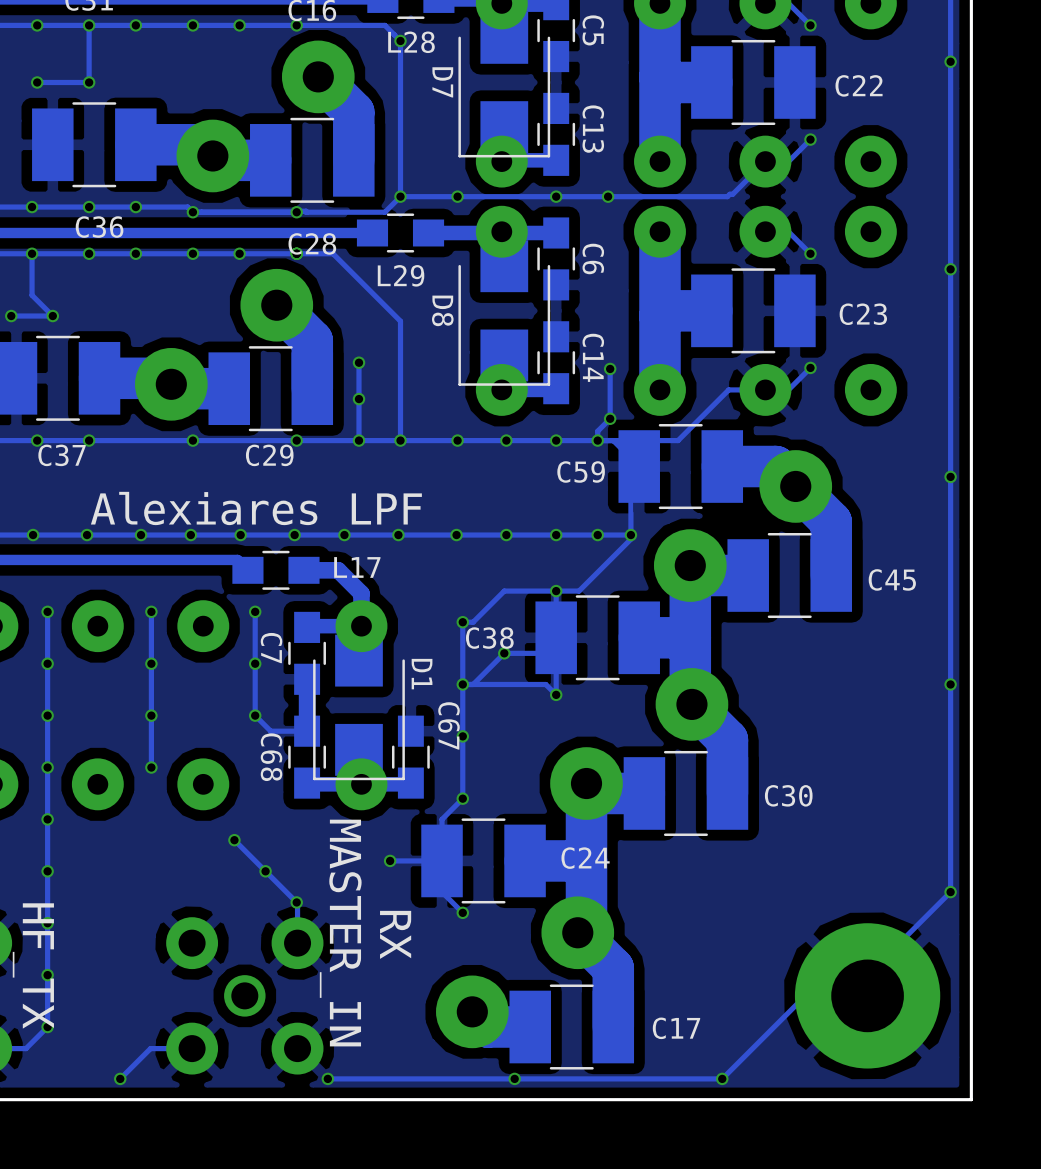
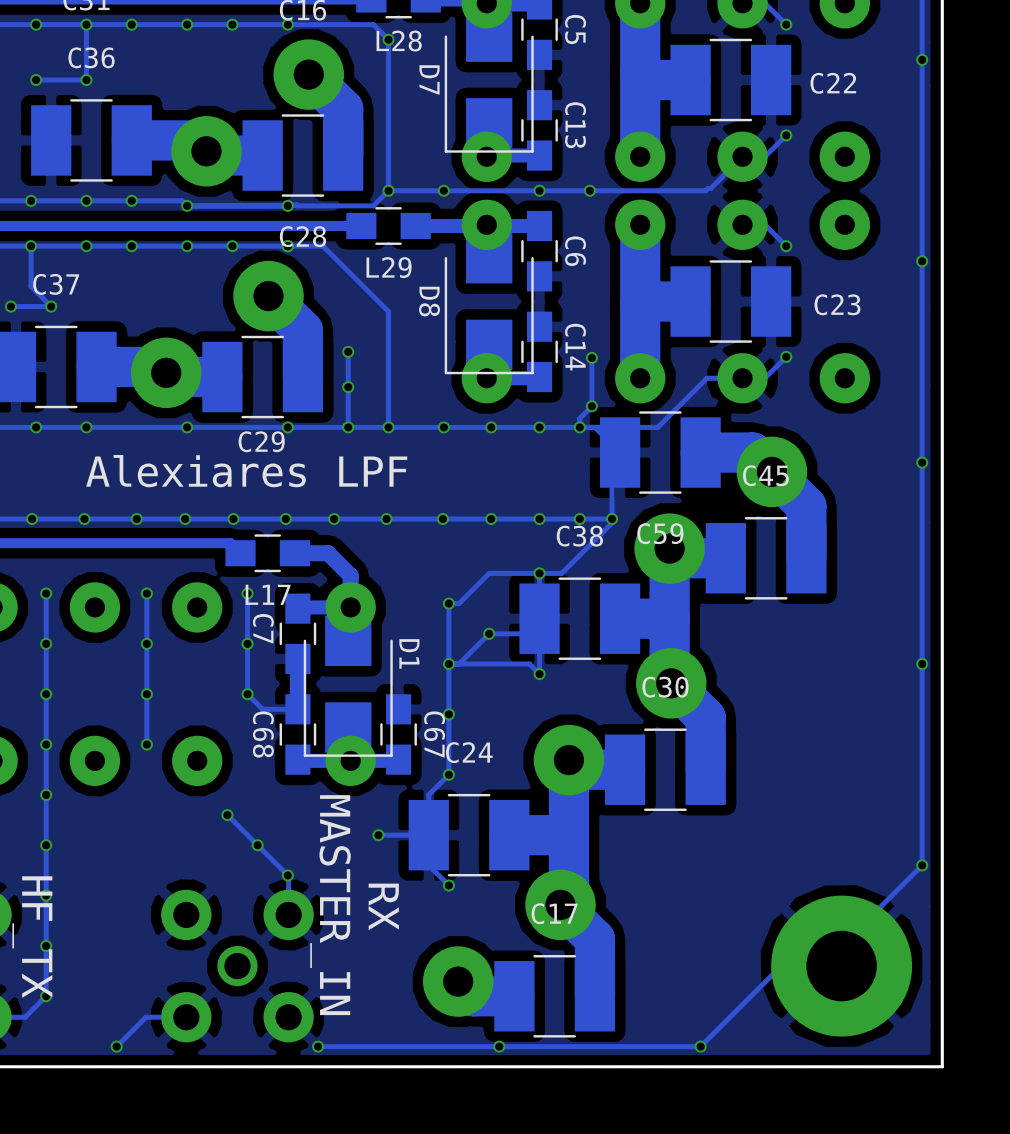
C36 name position: C36 (99, 227) -> C36 (91, 57)
C37 name position: C37 (62, 455) -> C37 (56, 284)
C59 name position: C59 (581, 471) -> C59 (660, 533)
text position: Alexiares LPF (256, 508) -> Alexiares LPF (246, 471)
L17 name position: L17 (357, 567) -> L17 (268, 594)
C45 name position: C45 (892, 579) -> C45 (765, 475)
C38 name position: C38 (489, 638) -> C38 (579, 536)
C67 name position: C67 (449, 725) -> C67 (434, 734)
C30 name position: C30 (788, 795) -> C30 (665, 687)
C24 name position: C24 (585, 858) -> C24 (469, 752)
C17 name position: C17 (676, 1028) -> C17 (554, 913)

